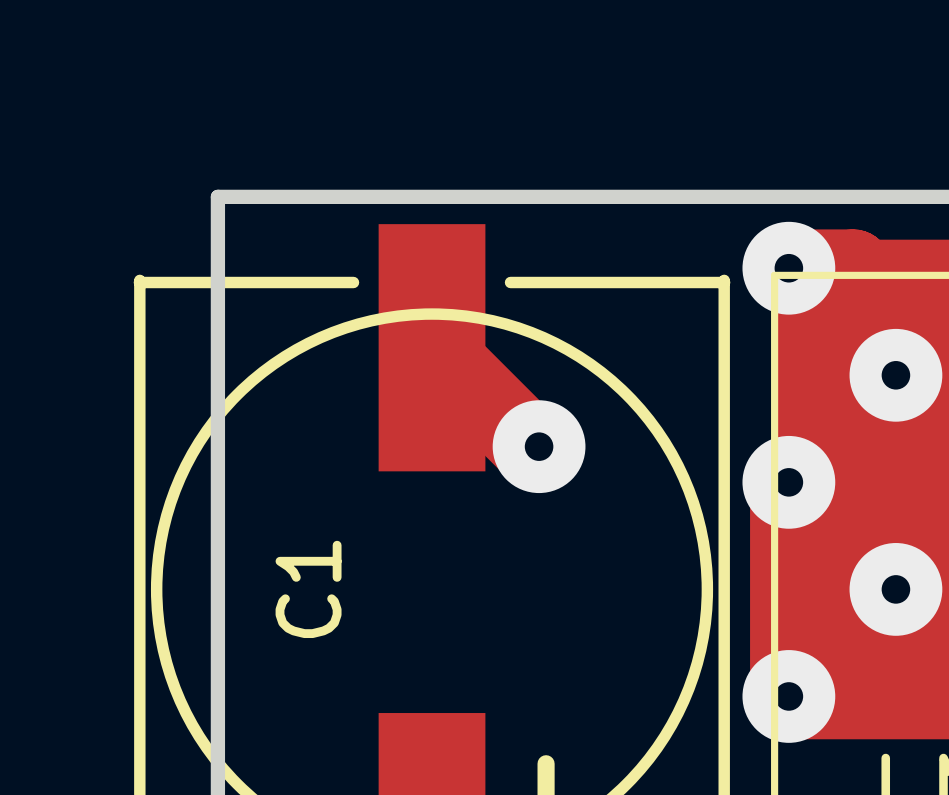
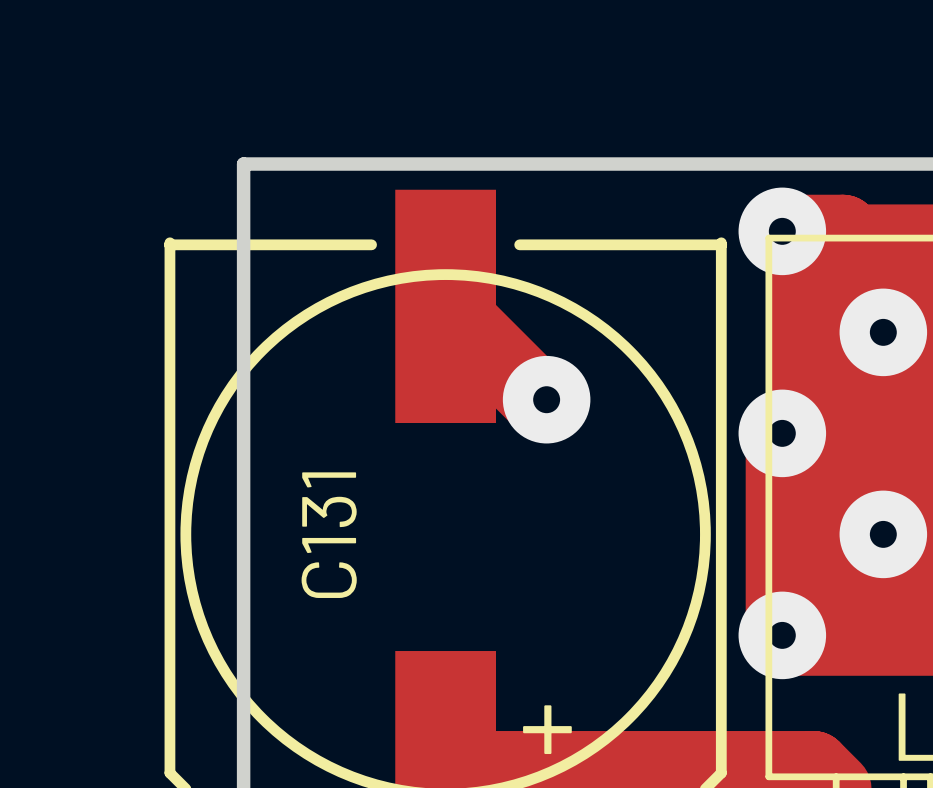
C1 name: C1 (308, 589) -> C131 (329, 535)

